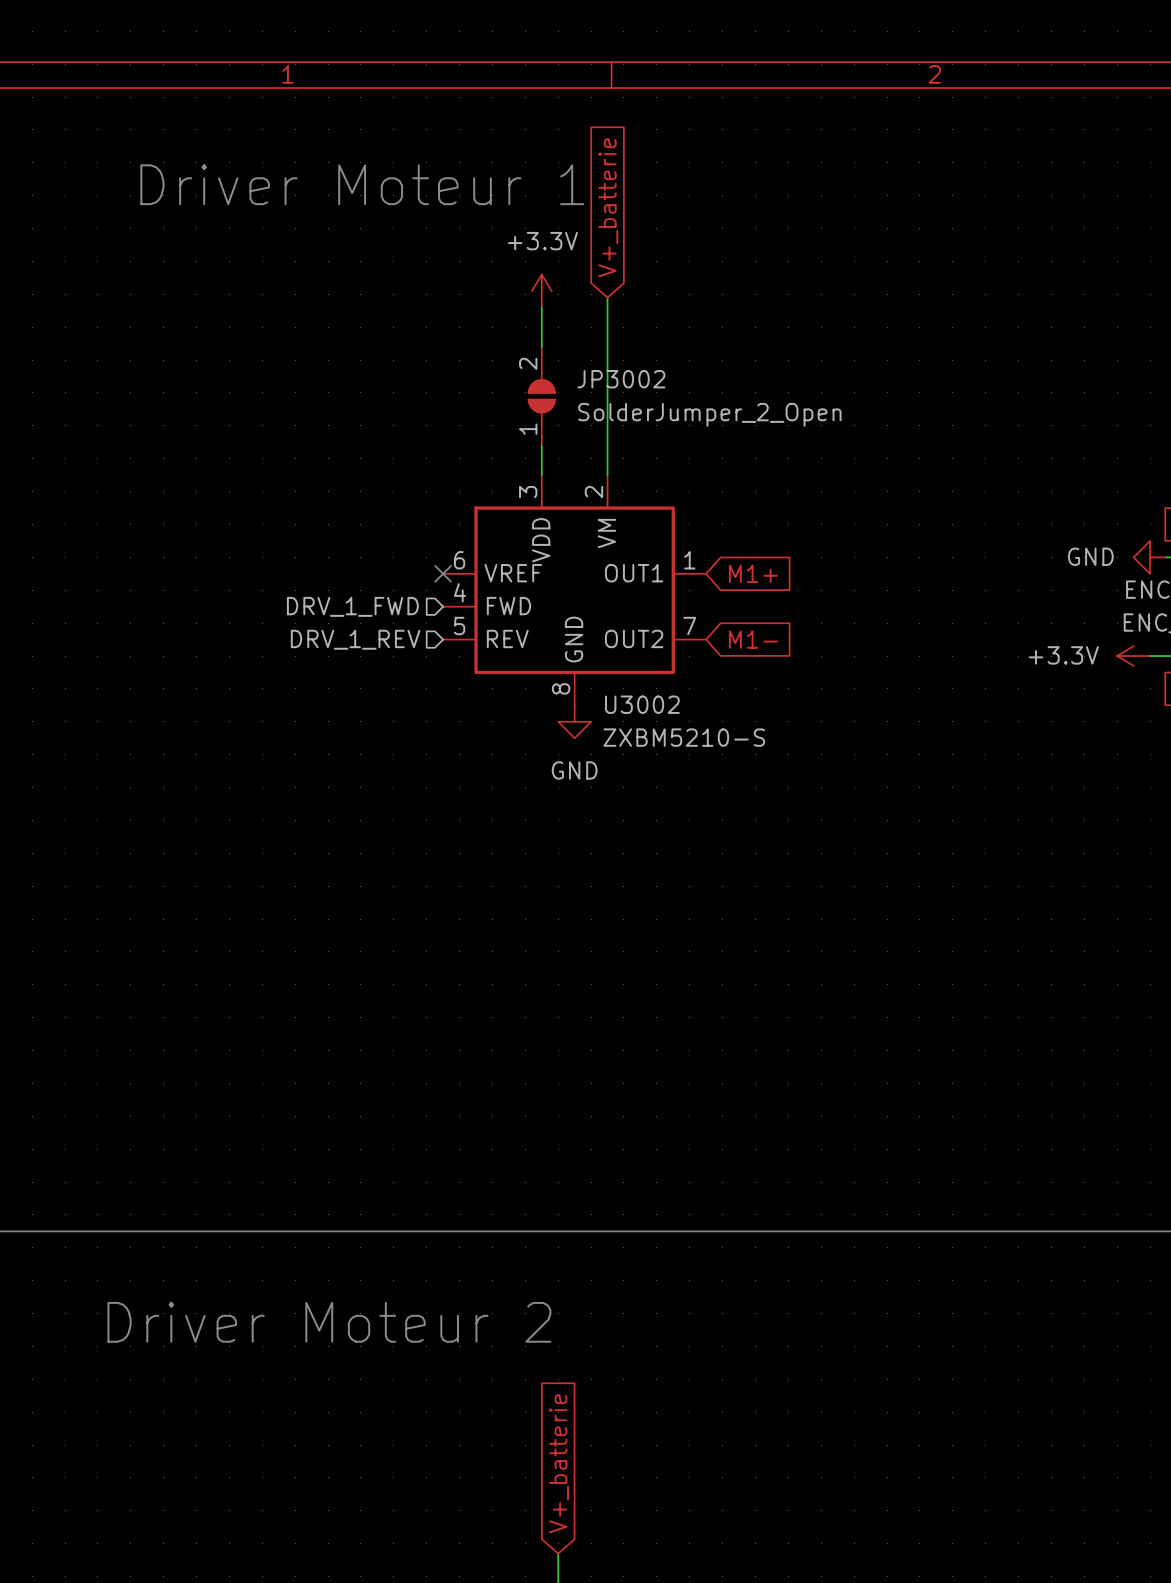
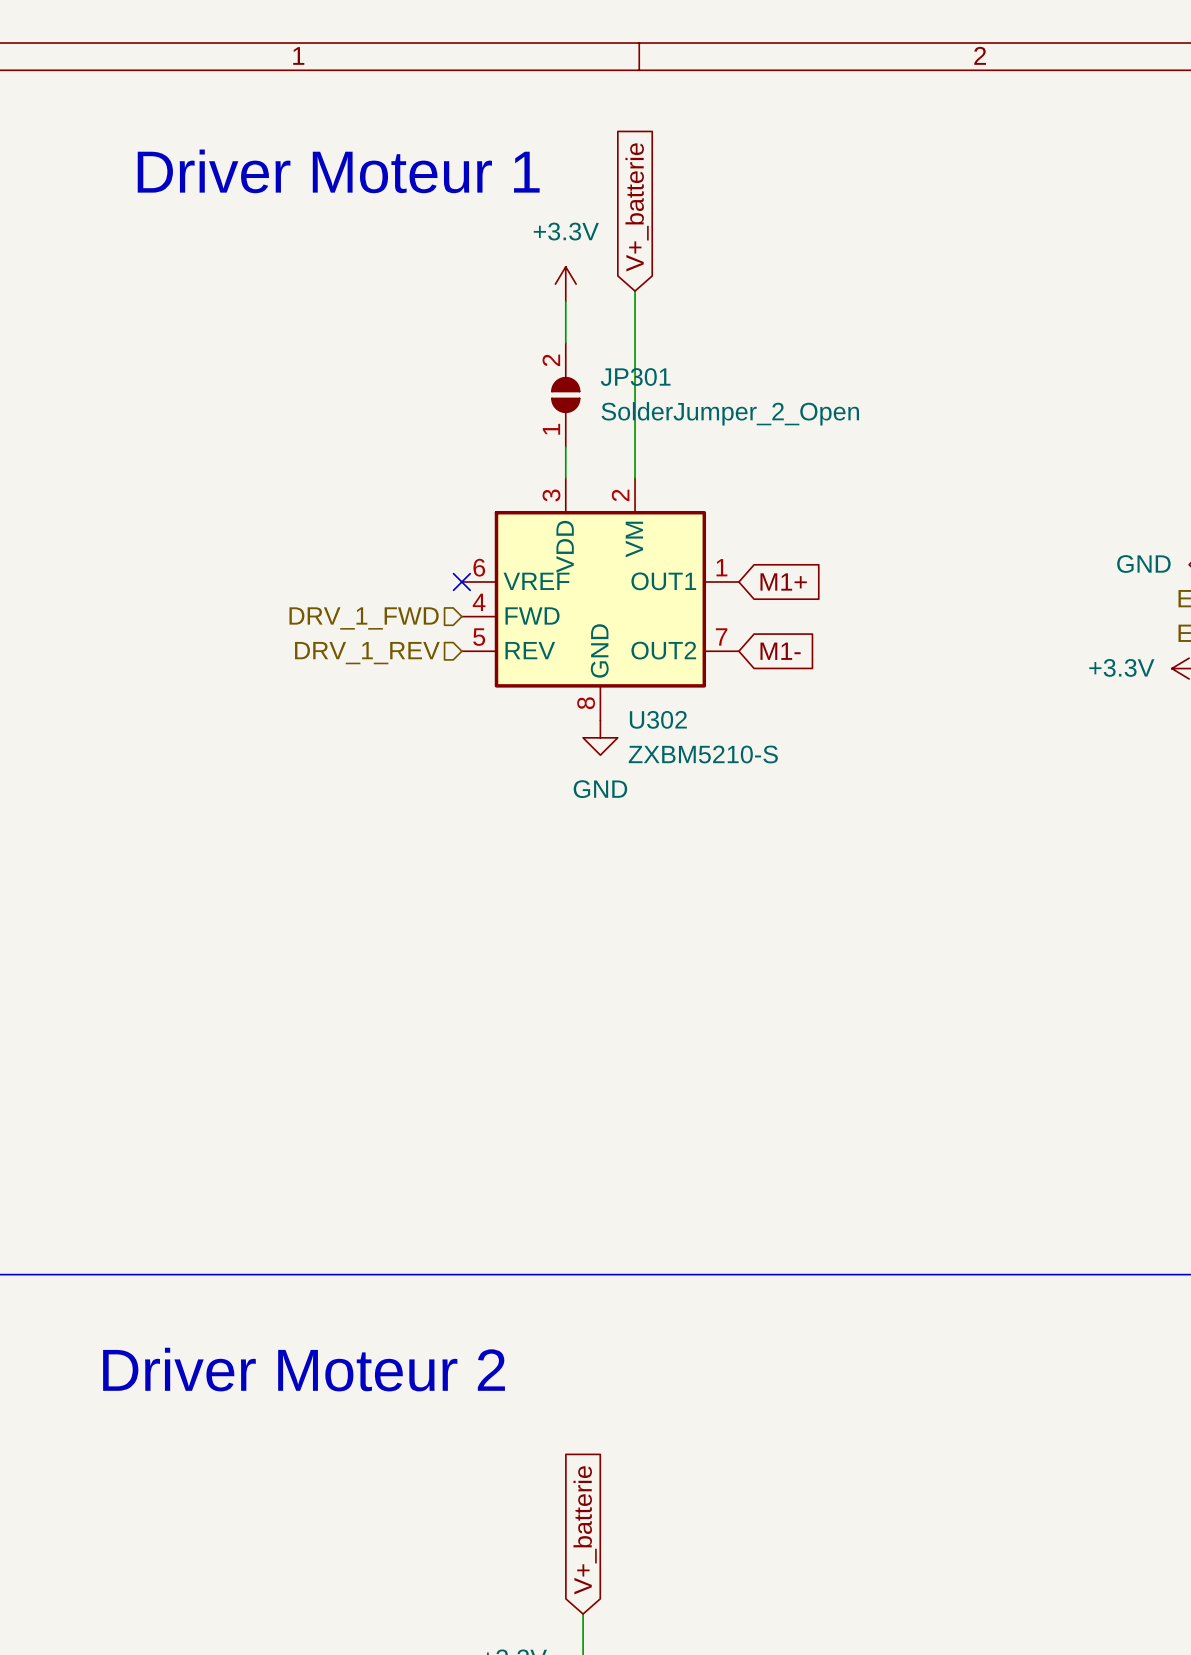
JP3002 name: JP3002 (621, 379) -> JP301 (635, 377)
U3002 name: U3002 (642, 704) -> U302 (658, 719)

